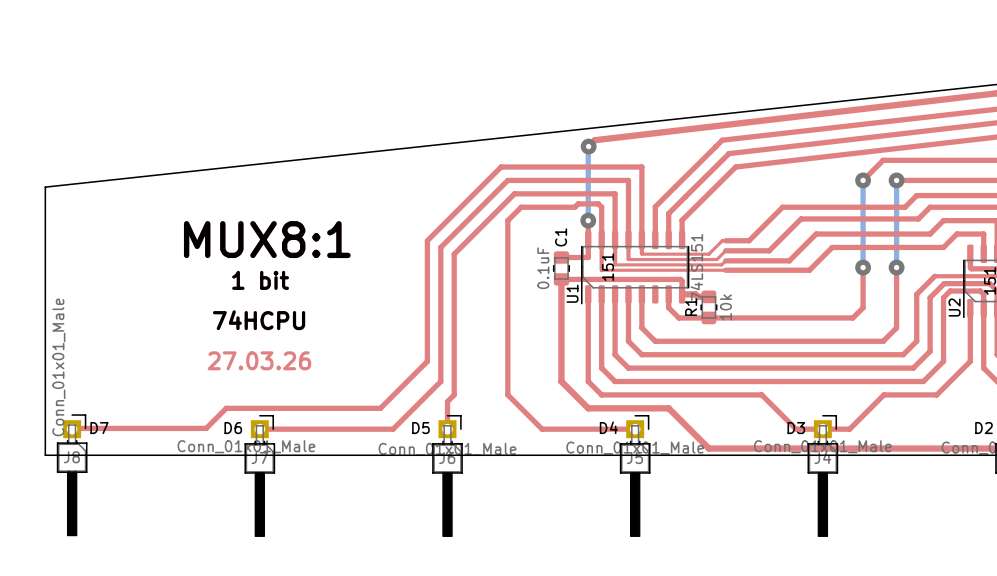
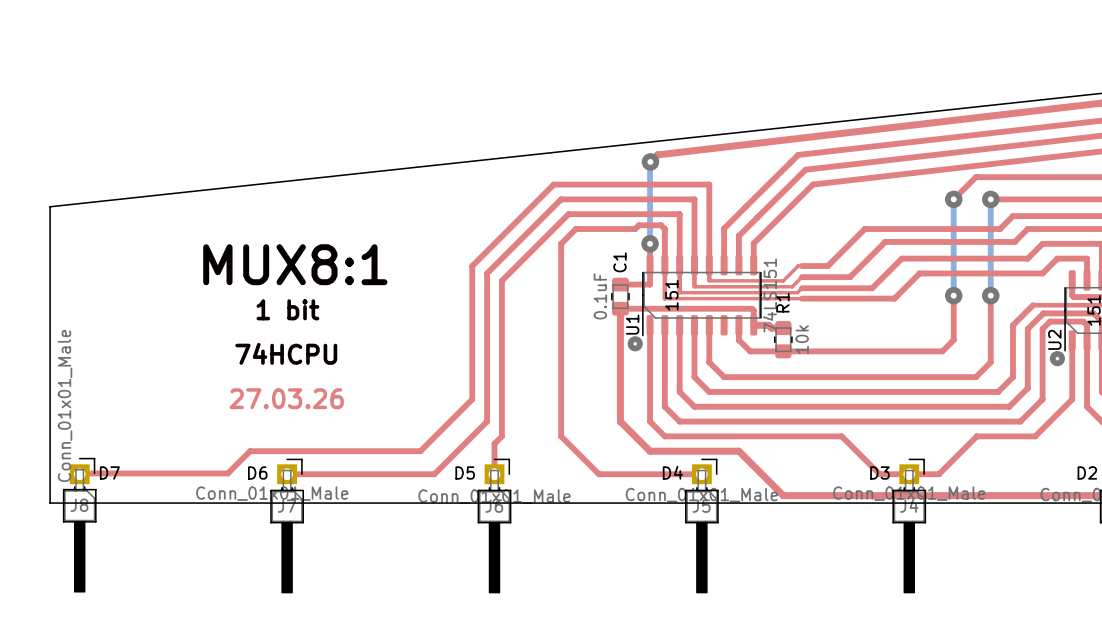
R1 name position: R1 (691, 307) -> R1 (782, 302)
via: none -> (635, 343)
via: none -> (1057, 358)

